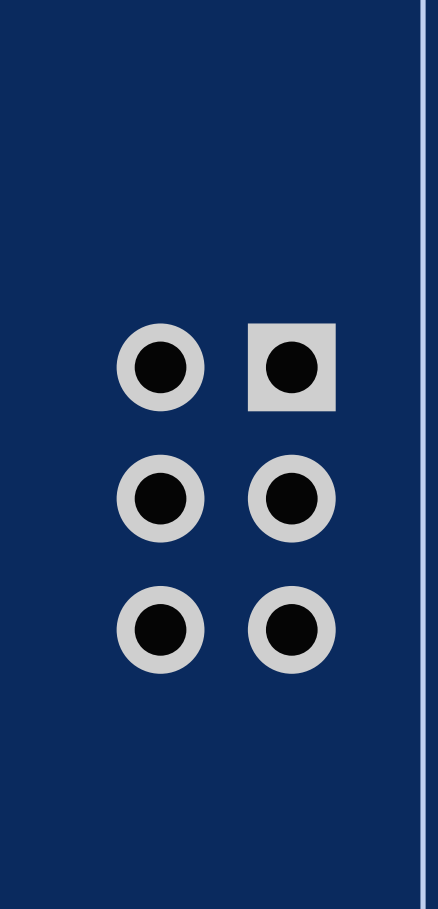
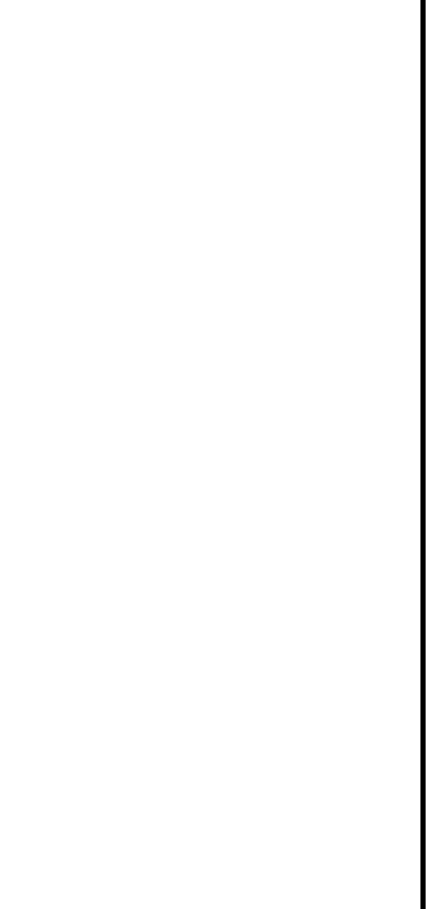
part: (226, 498) -> none

